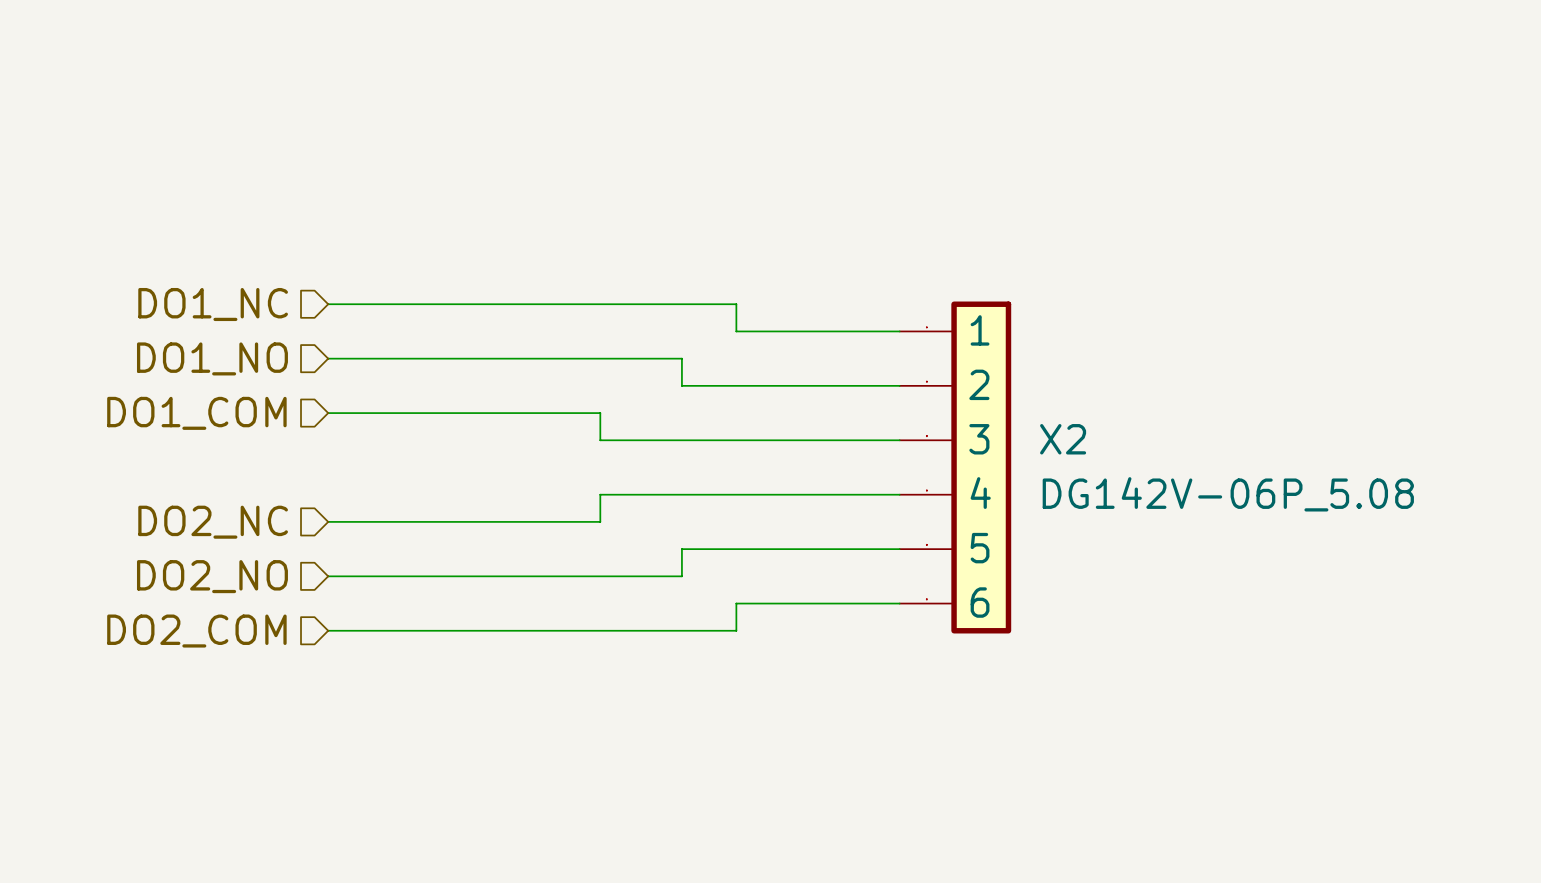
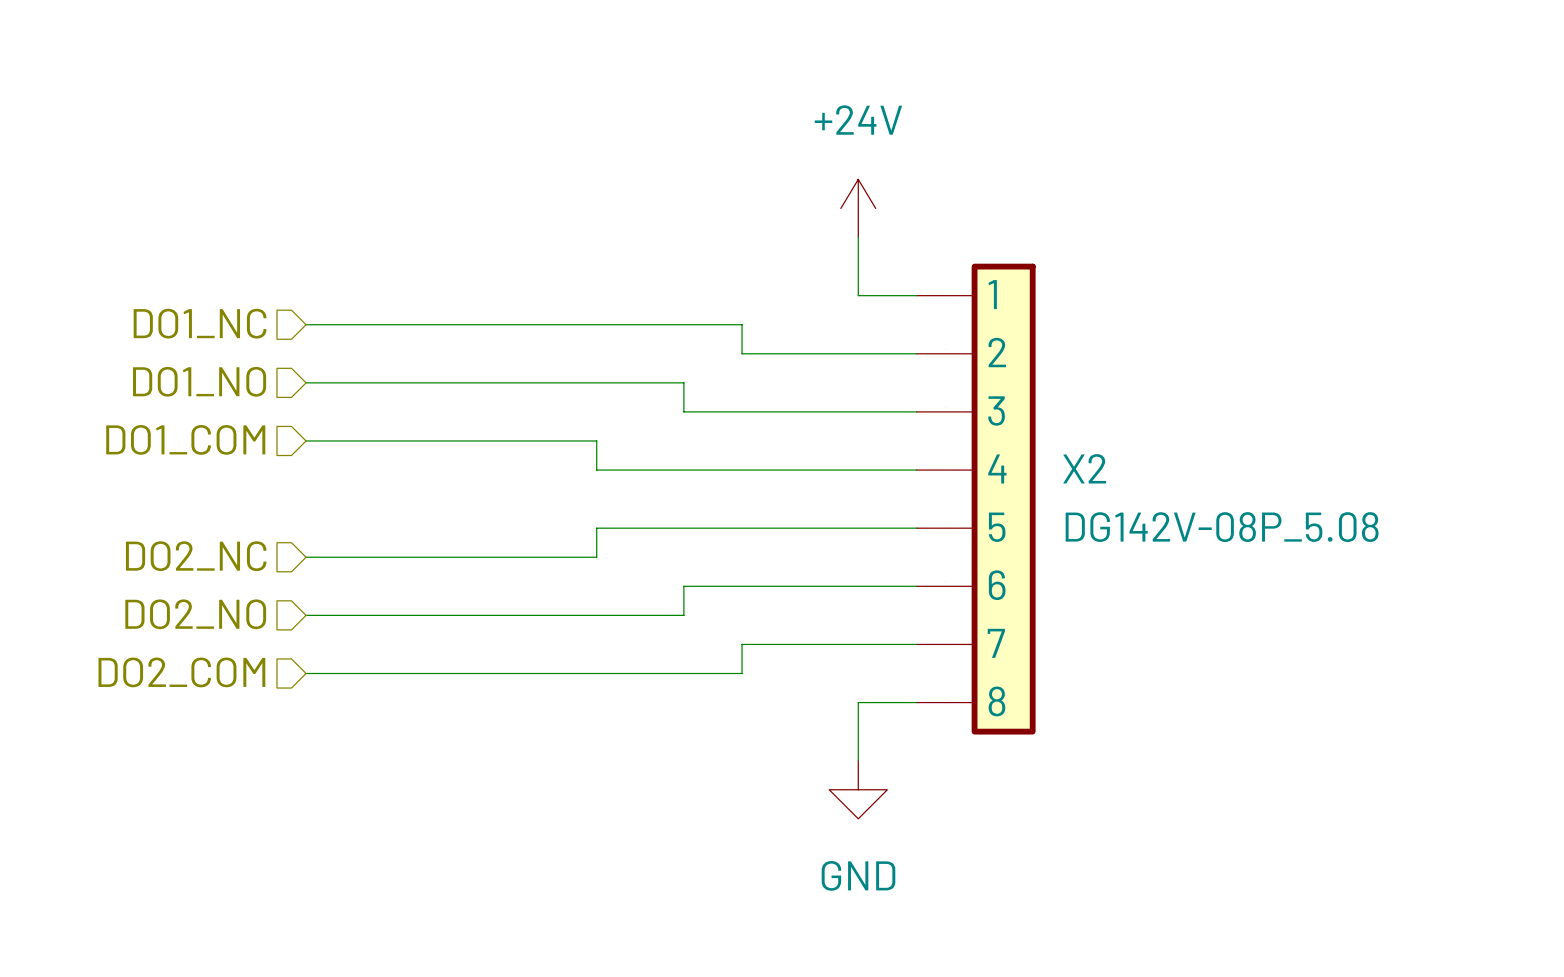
power symbol: none -> +24V (858, 208)
wire: none -> (858, 237) (858, 295) (916, 295)
X2 symbol: [899, 301, 1012, 634] -> [916, 263, 1036, 735]
X2 value: DG142V-06P_5.08 (1228, 494) -> DG142V-08P_5.08 (1222, 527)
wire: none -> (916, 702) (858, 702) (858, 760)
power symbol: none -> GND (858, 789)

